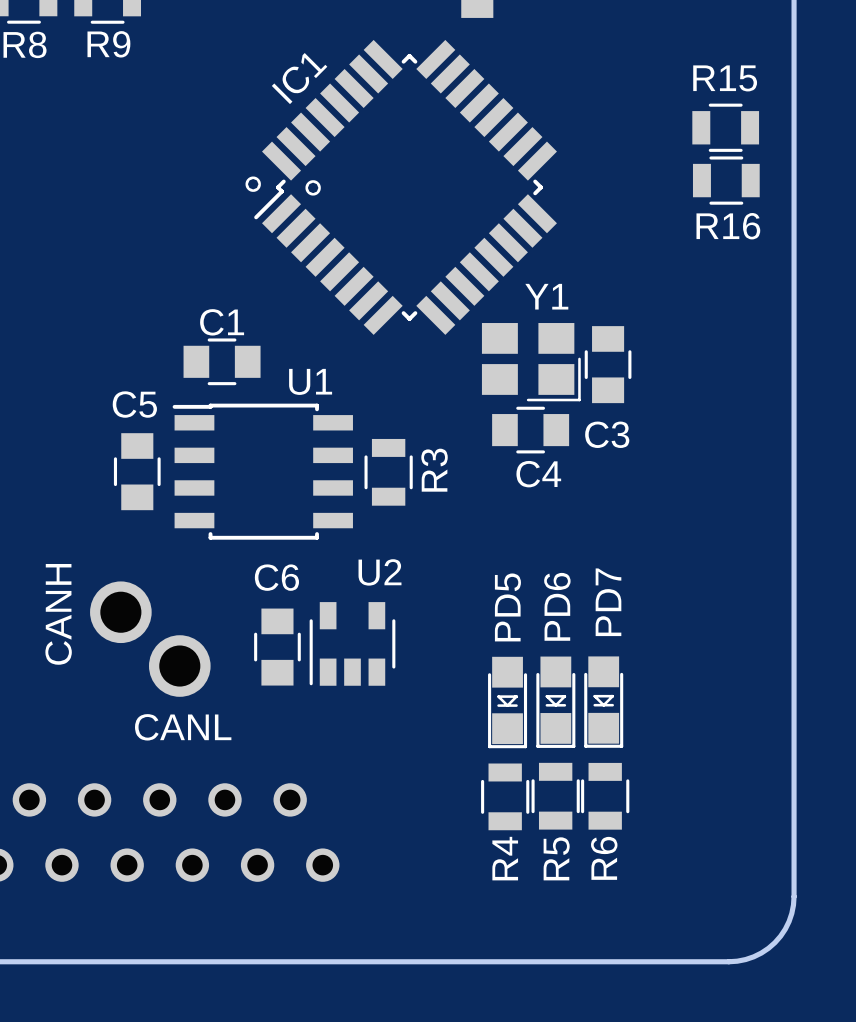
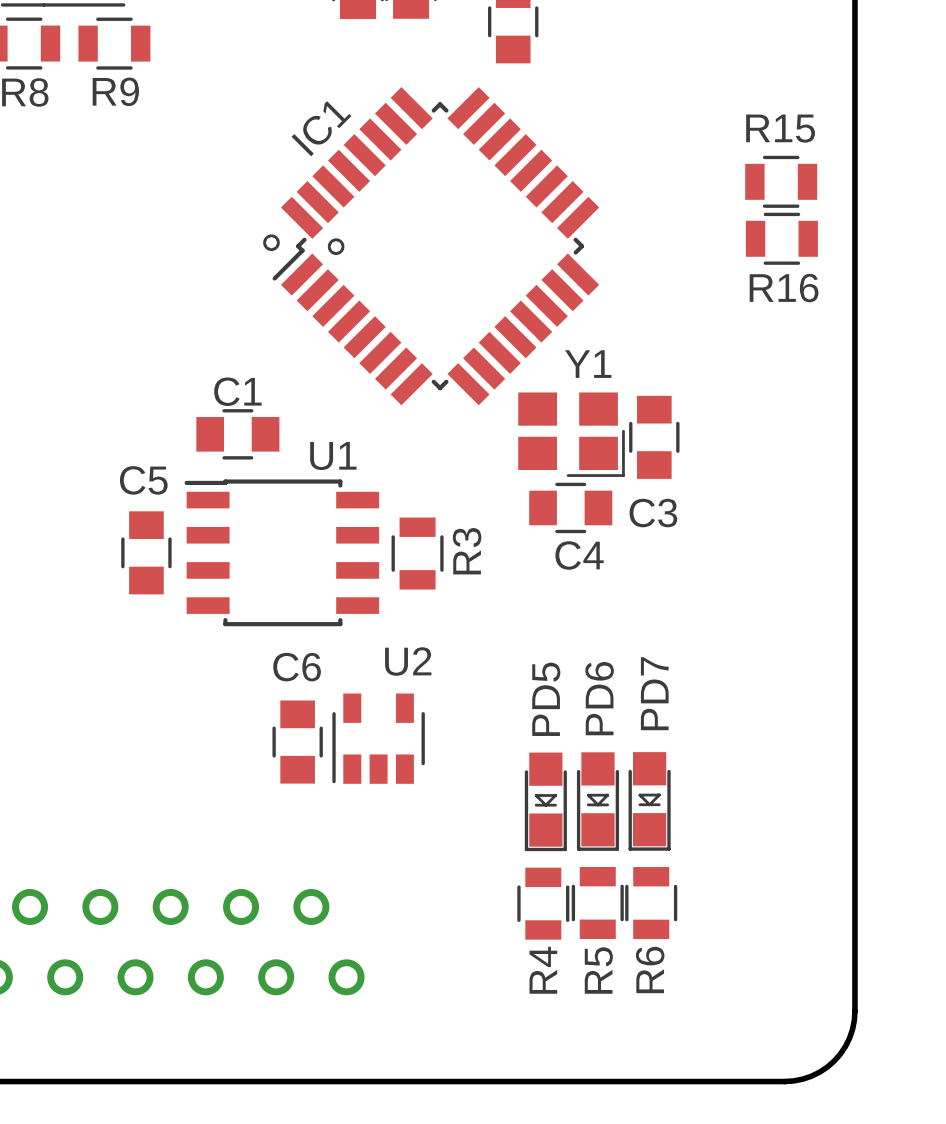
CANH: (120, 612) -> none
CANL: (179, 666) -> none

